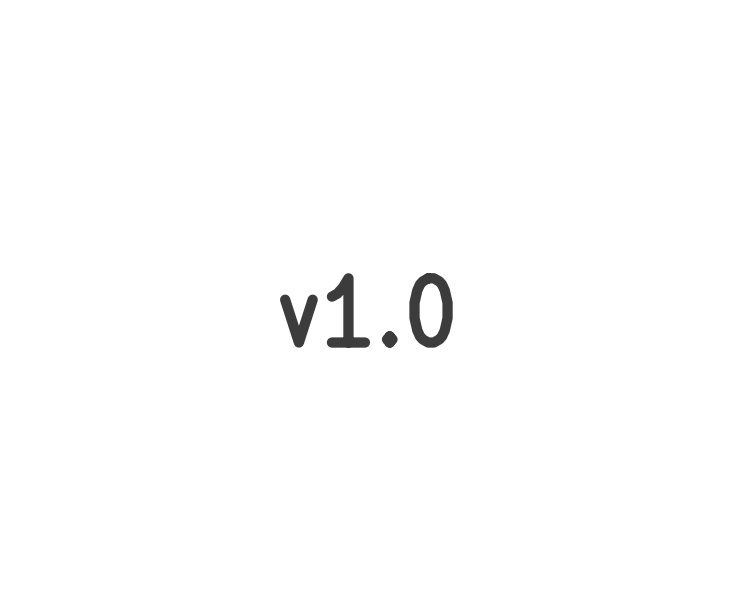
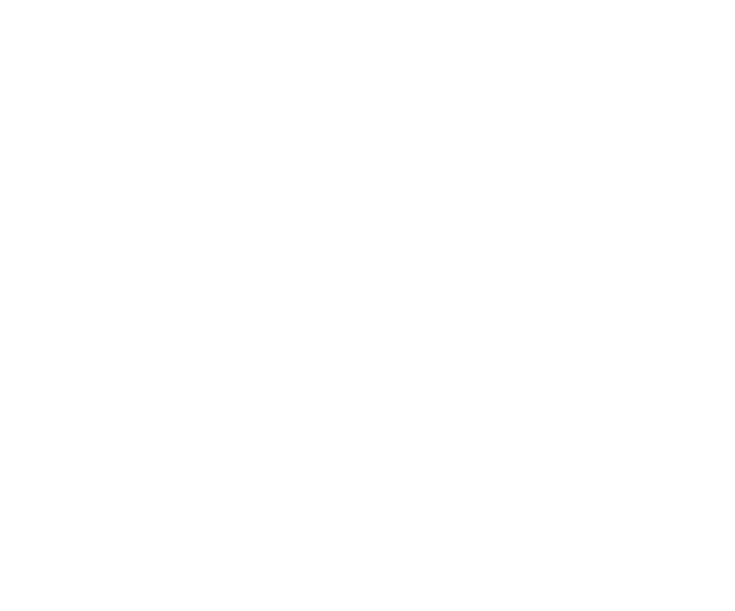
text: v1.0 (366, 310) -> none

